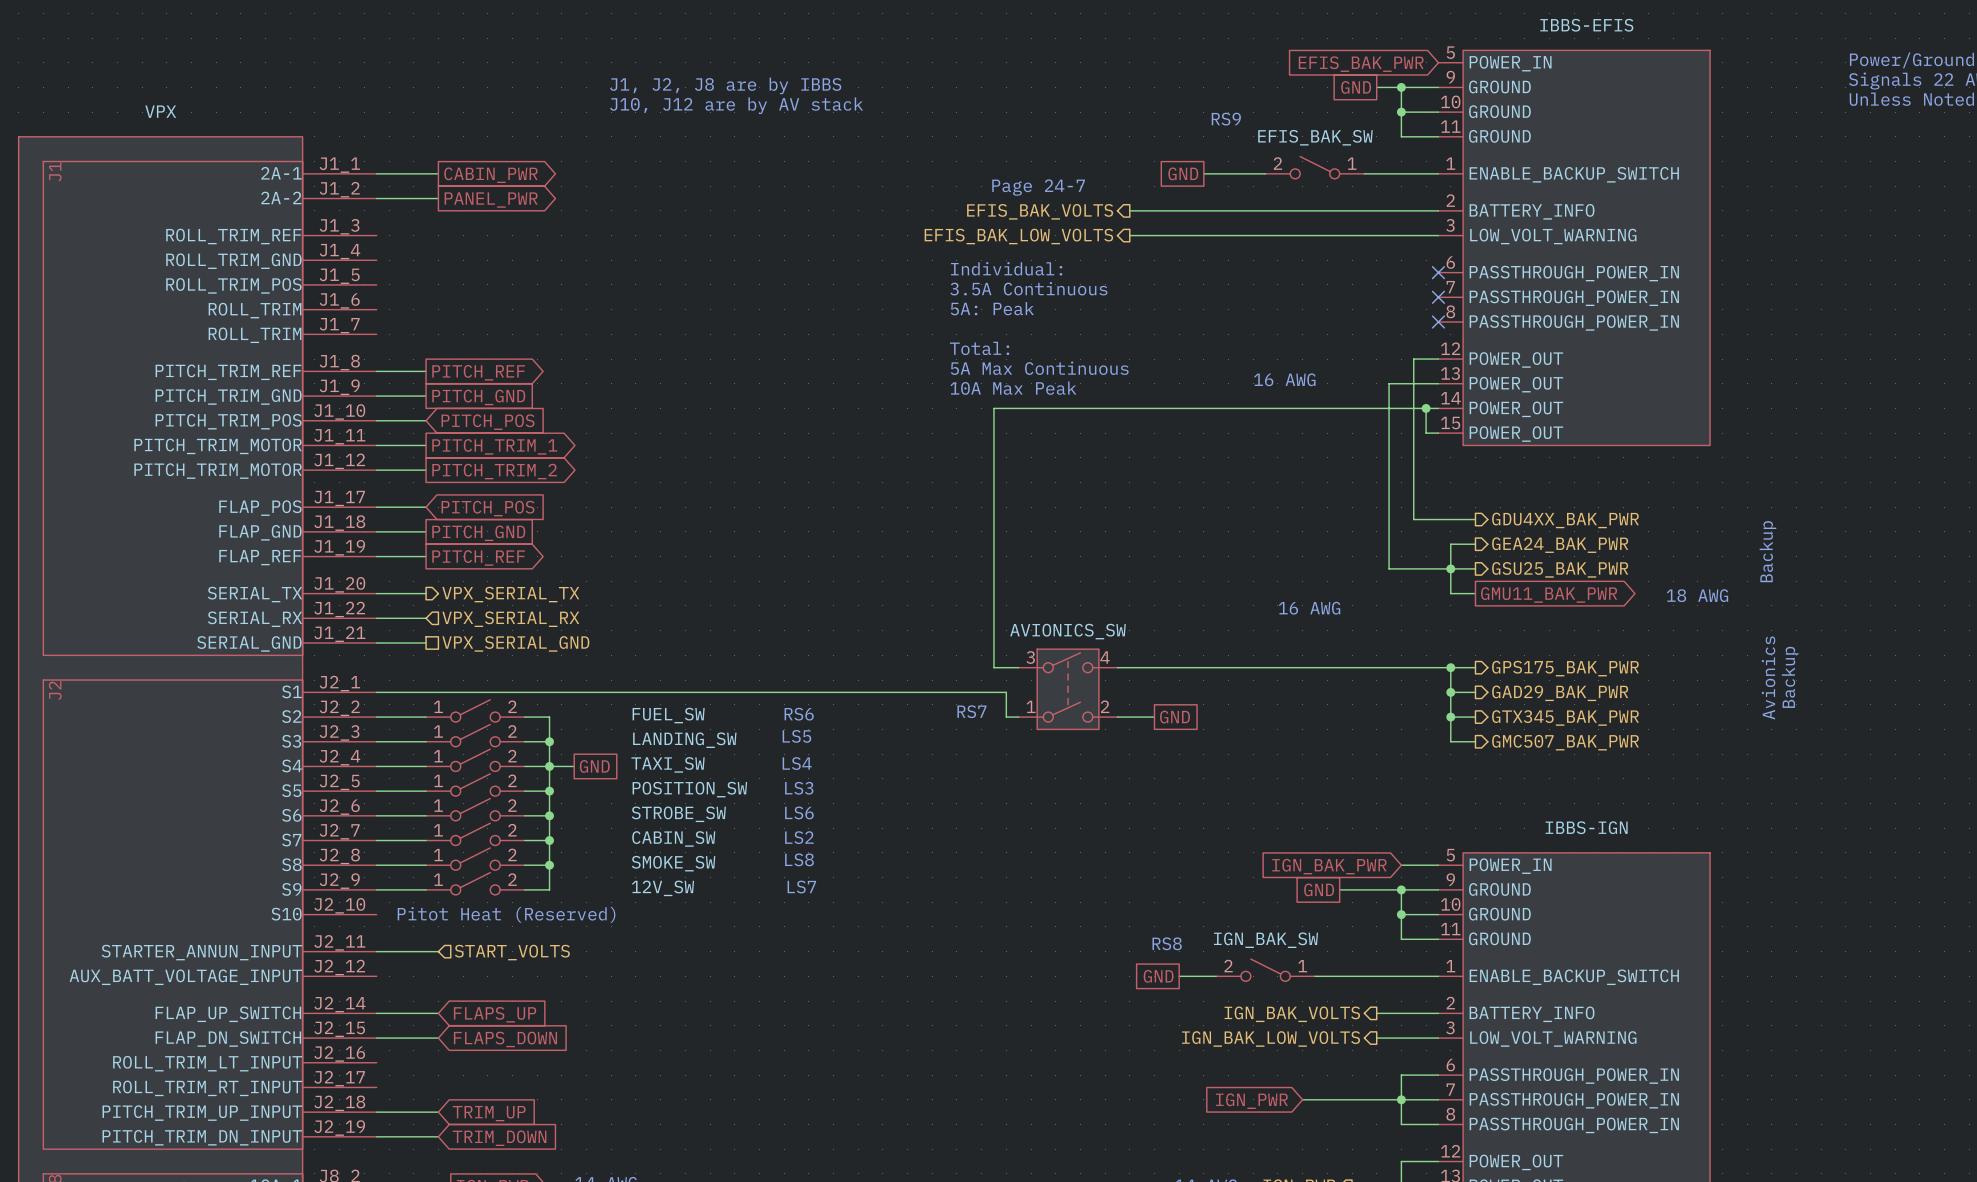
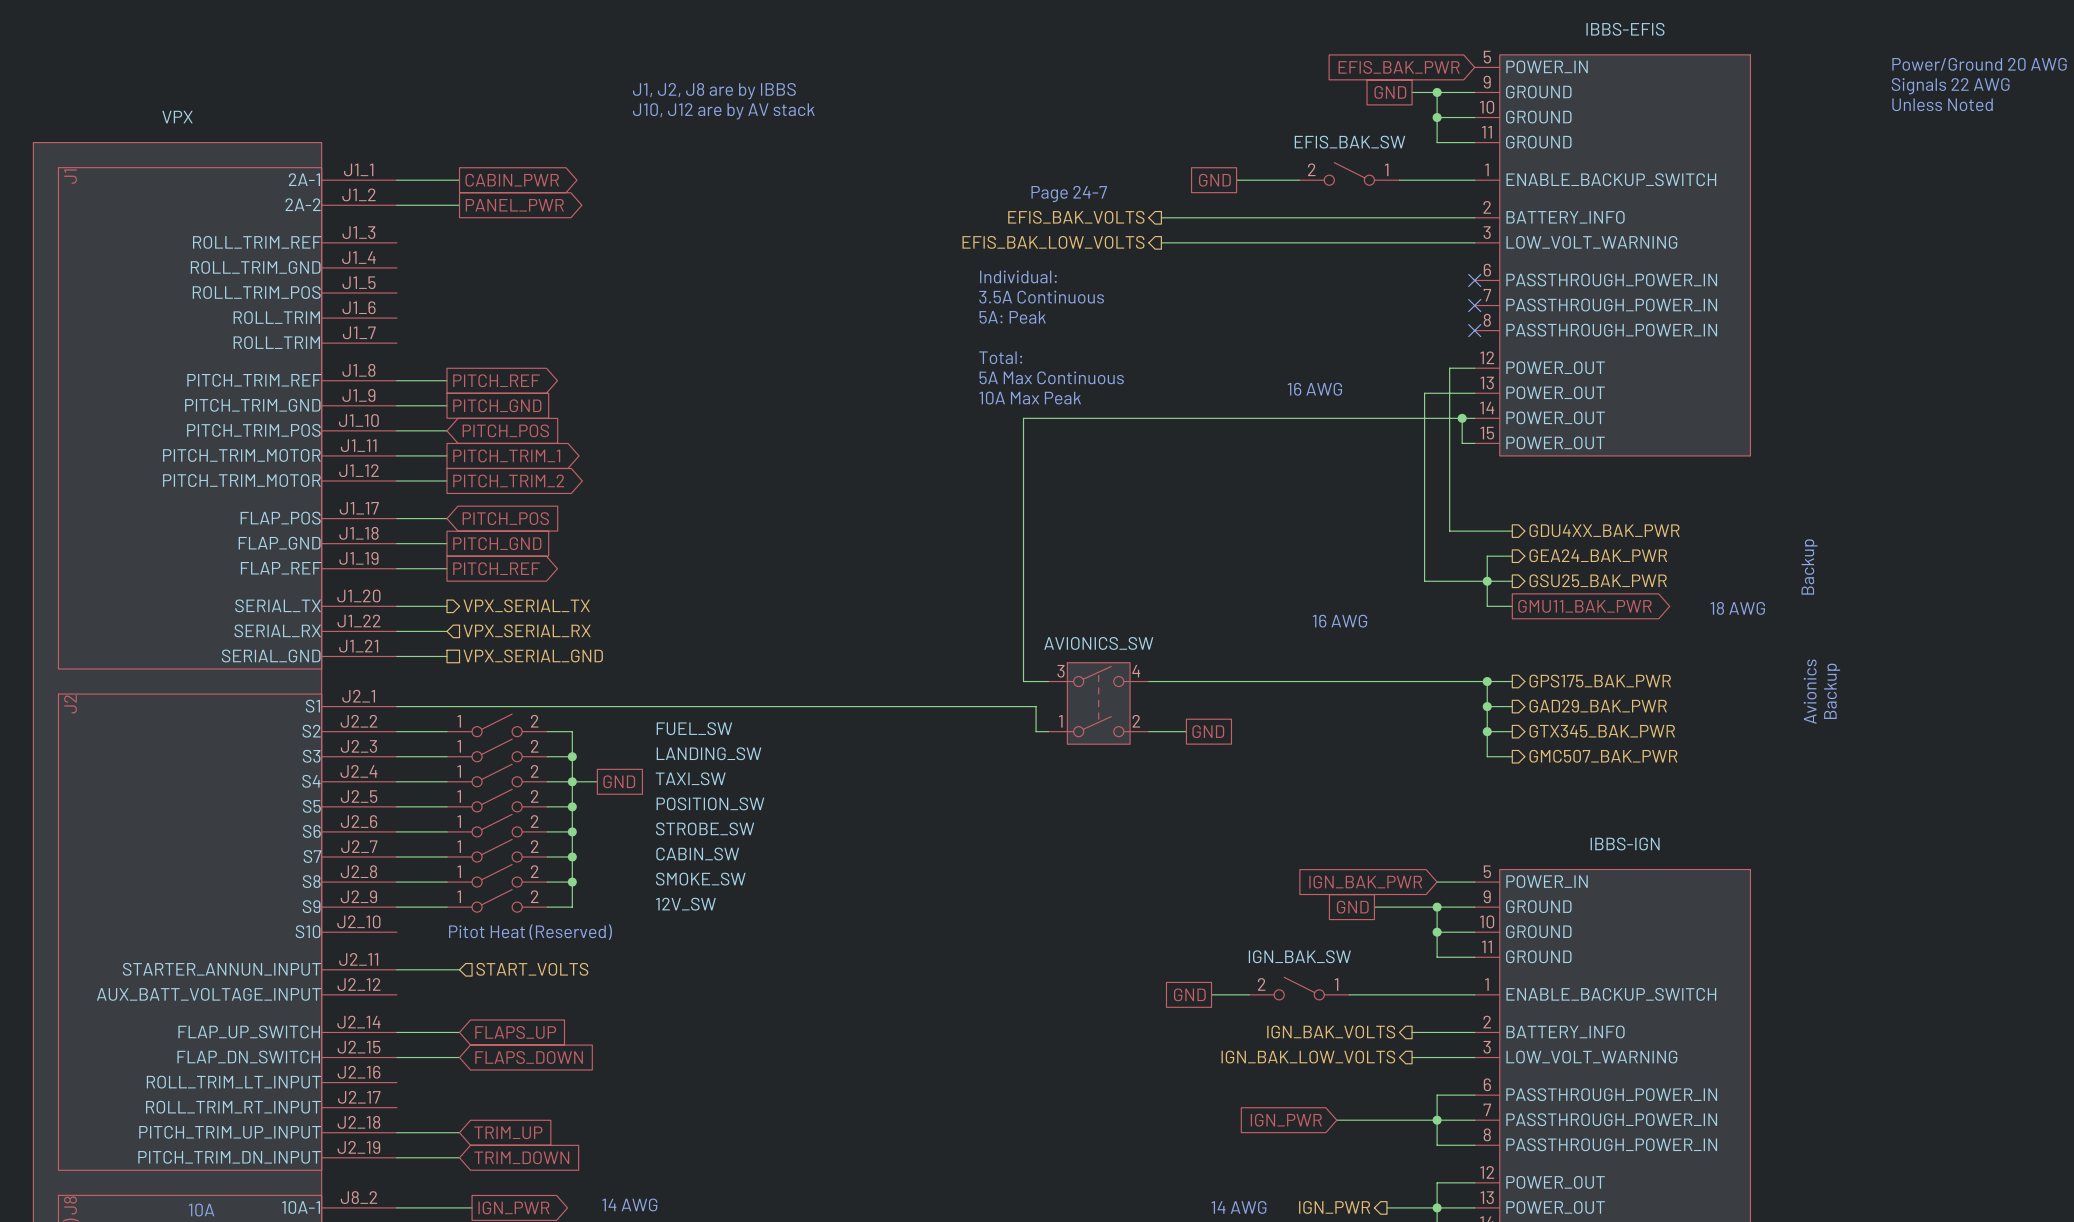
text: RS9 (1226, 119) -> none
text: RS7 (971, 711) -> none
text: RS6 (799, 714) -> none
text: LS5 (796, 736) -> none
text: LS4 (797, 763) -> none
text: LS3 (799, 788) -> none
text: LS6 (799, 812) -> none
text: LS2 (799, 837) -> none
text: LS8 (799, 859) -> none
text: LS7 (801, 887) -> none
text: RS8 (1167, 943) -> none

